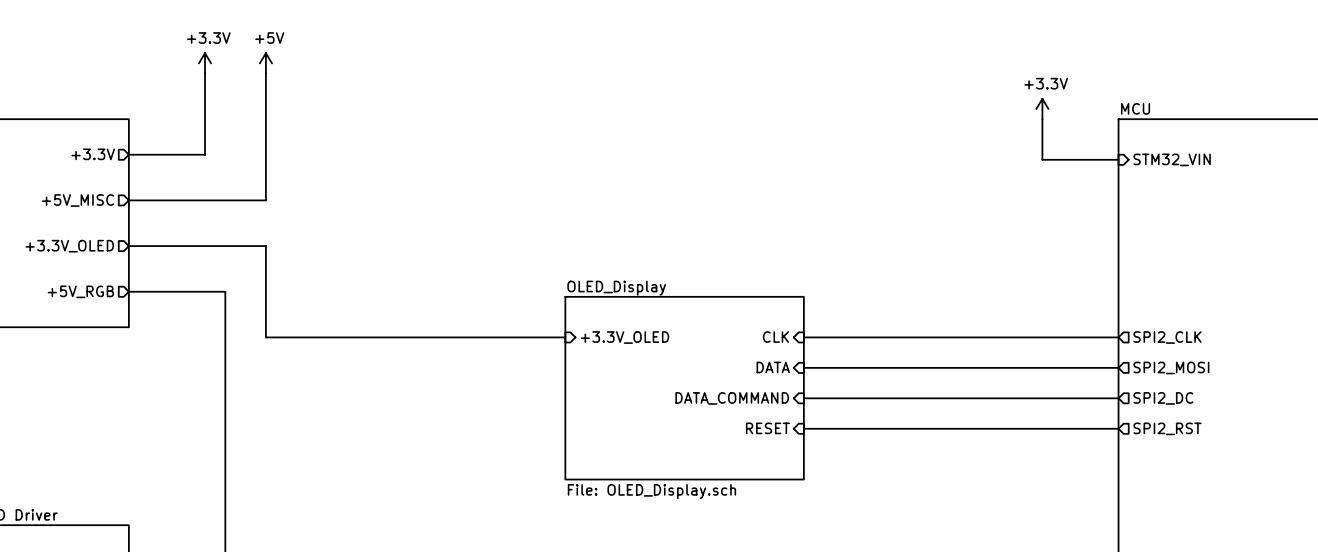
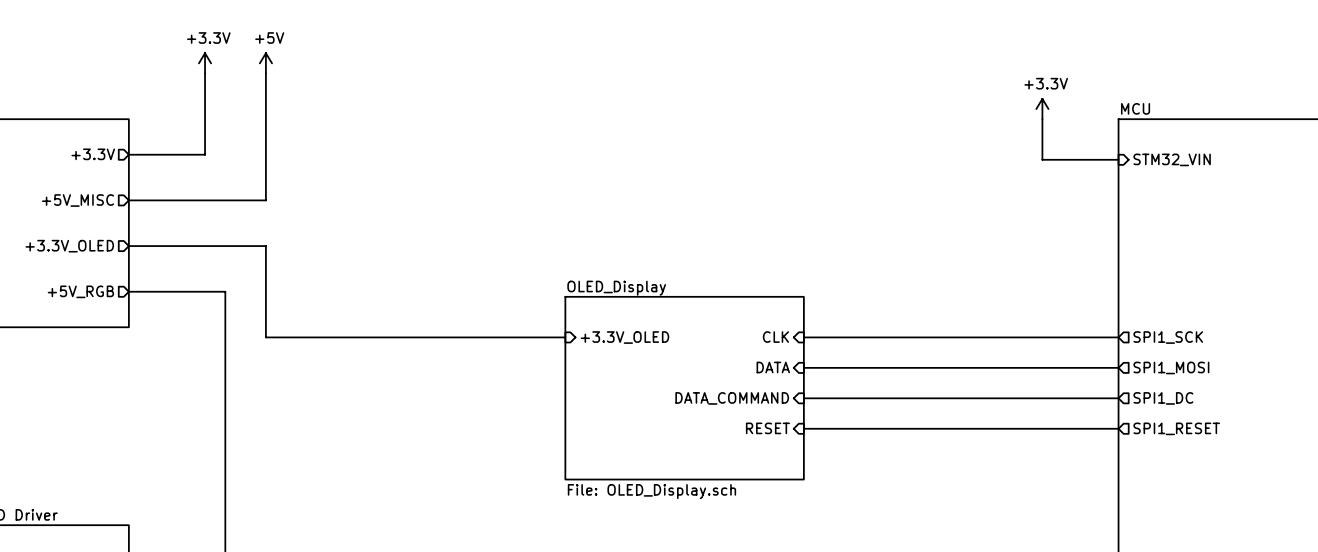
sheet pin: SPI2_CLK (1167, 337) -> SPI1_SCK (1168, 337)
sheet pin: SPI2_MOSI (1171, 367) -> SPI1_MOSI (1171, 367)
sheet pin: SPI2_DC (1163, 398) -> SPI1_DC (1163, 398)
sheet pin: SPI2_RST (1167, 428) -> SPI1_RESET (1176, 428)

